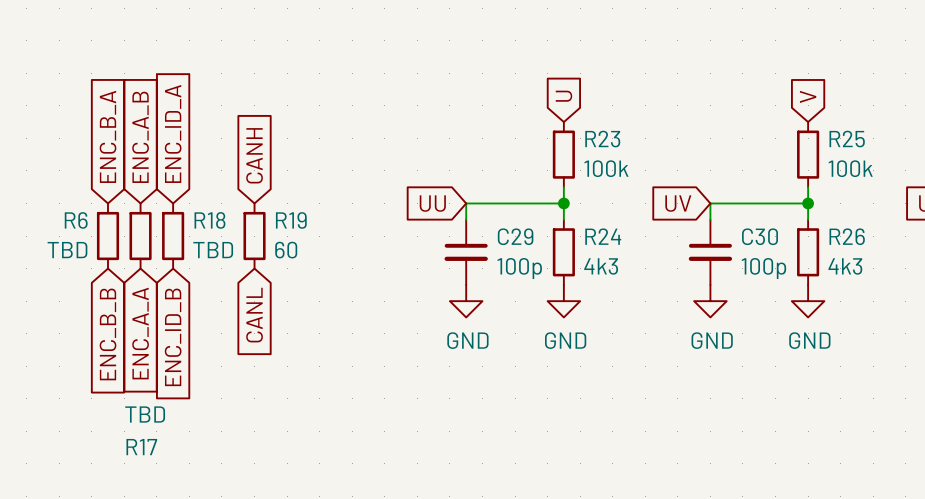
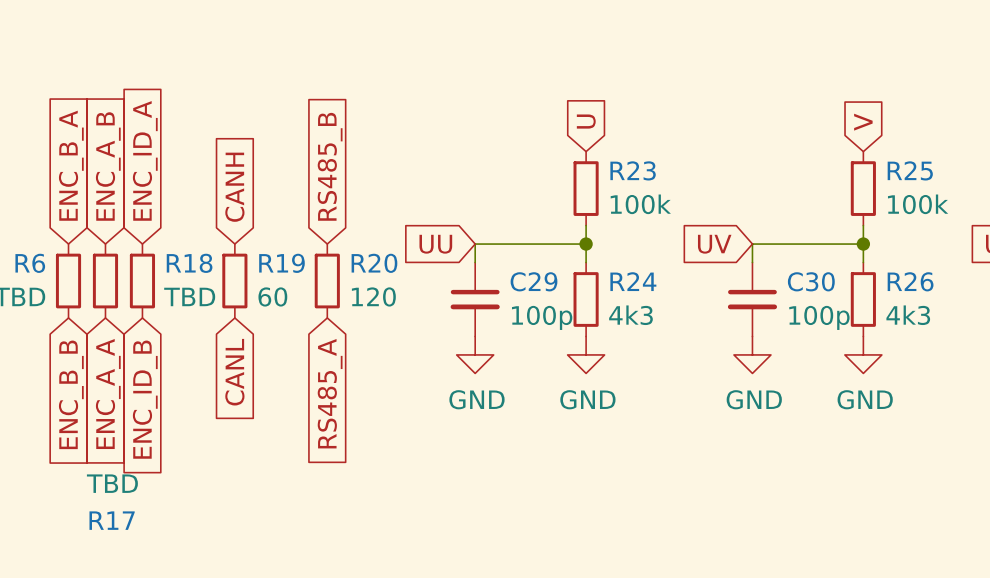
global label: none -> RS485_B (330, 166)
R20: none -> 120 (327, 281)
global label: none -> RS485_A (330, 393)

